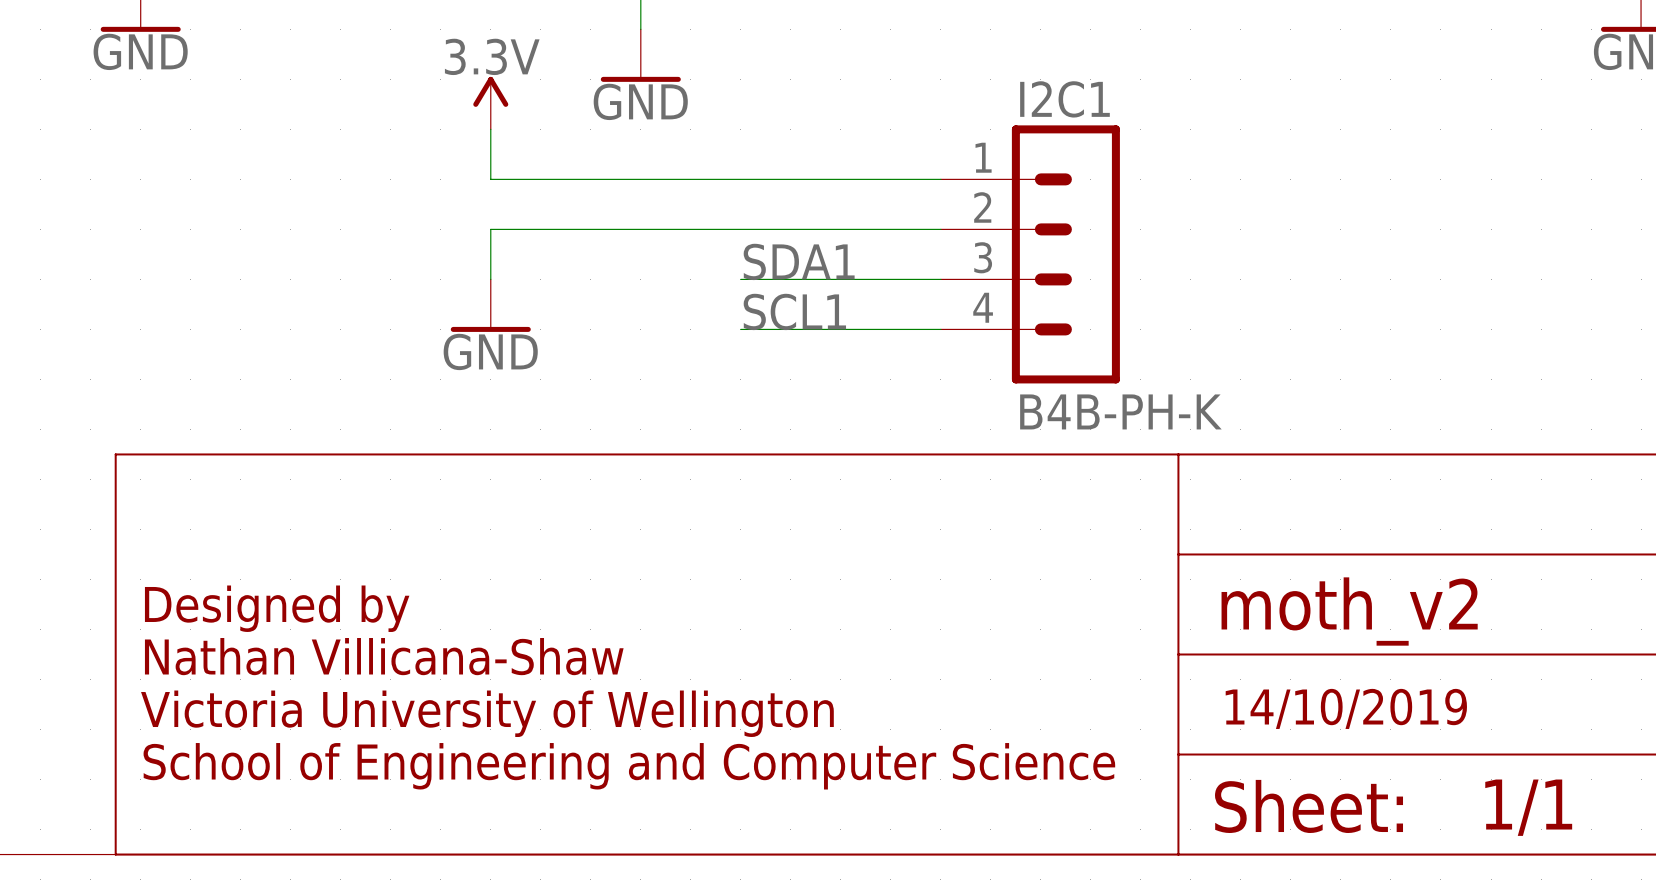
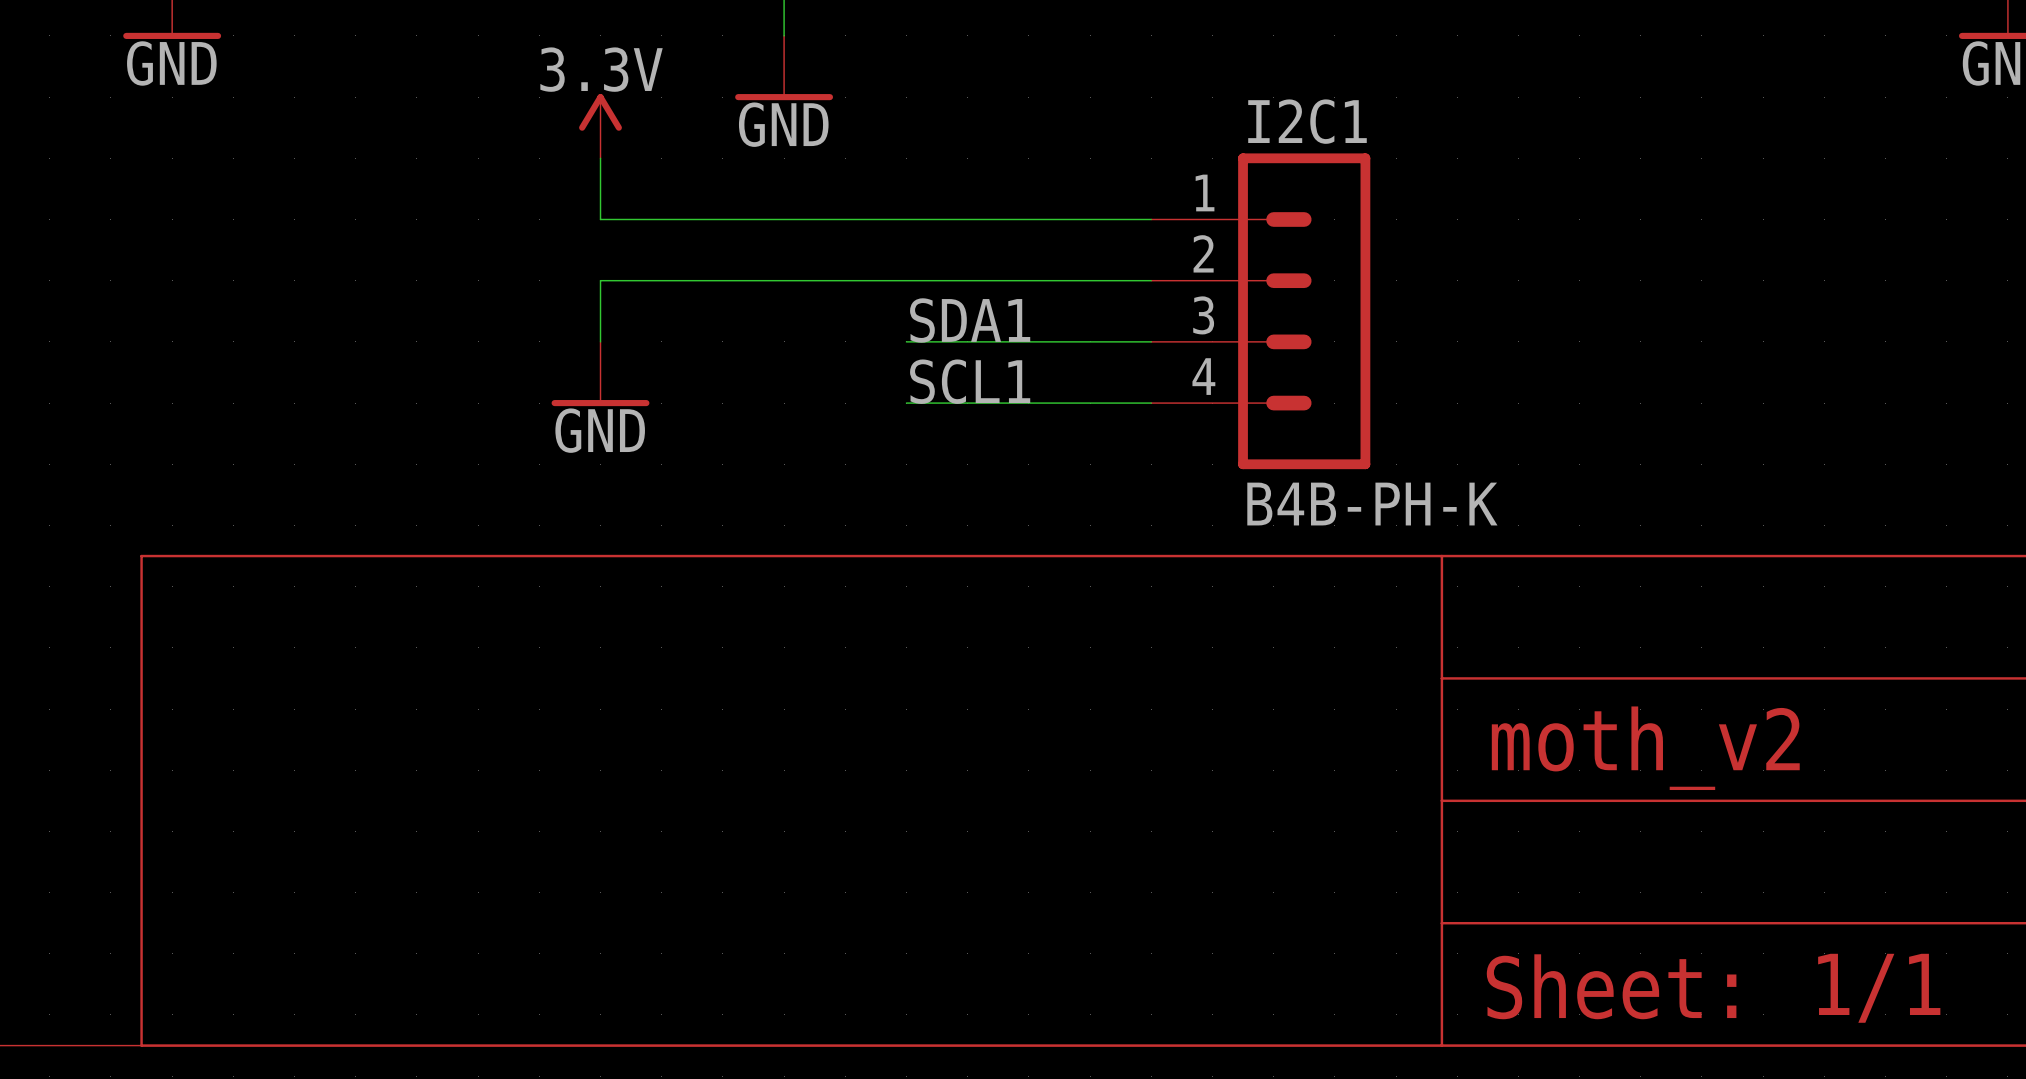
text: Designed by (277, 608) -> none
text: Nathan Villicana-Shaw (384, 656) -> none
text: 14/10/2019 (1346, 708) -> none
text: Victoria University of Wellington (487, 713) -> none
text: School of Engineering and Computer Science (629, 766) -> none

